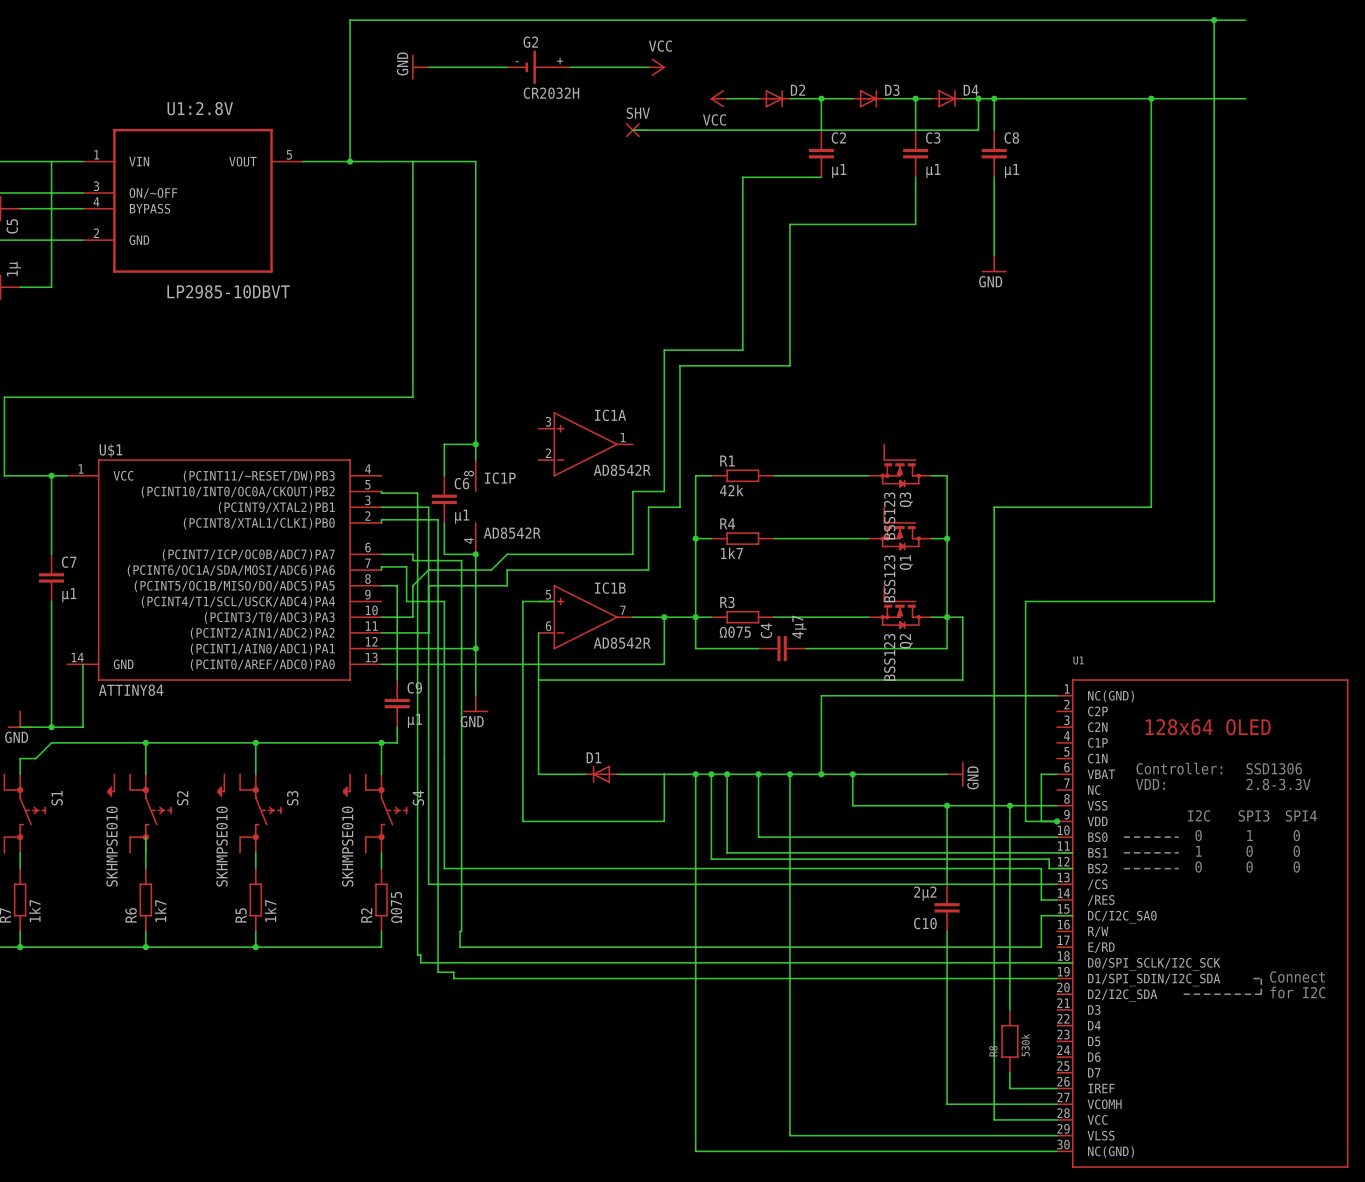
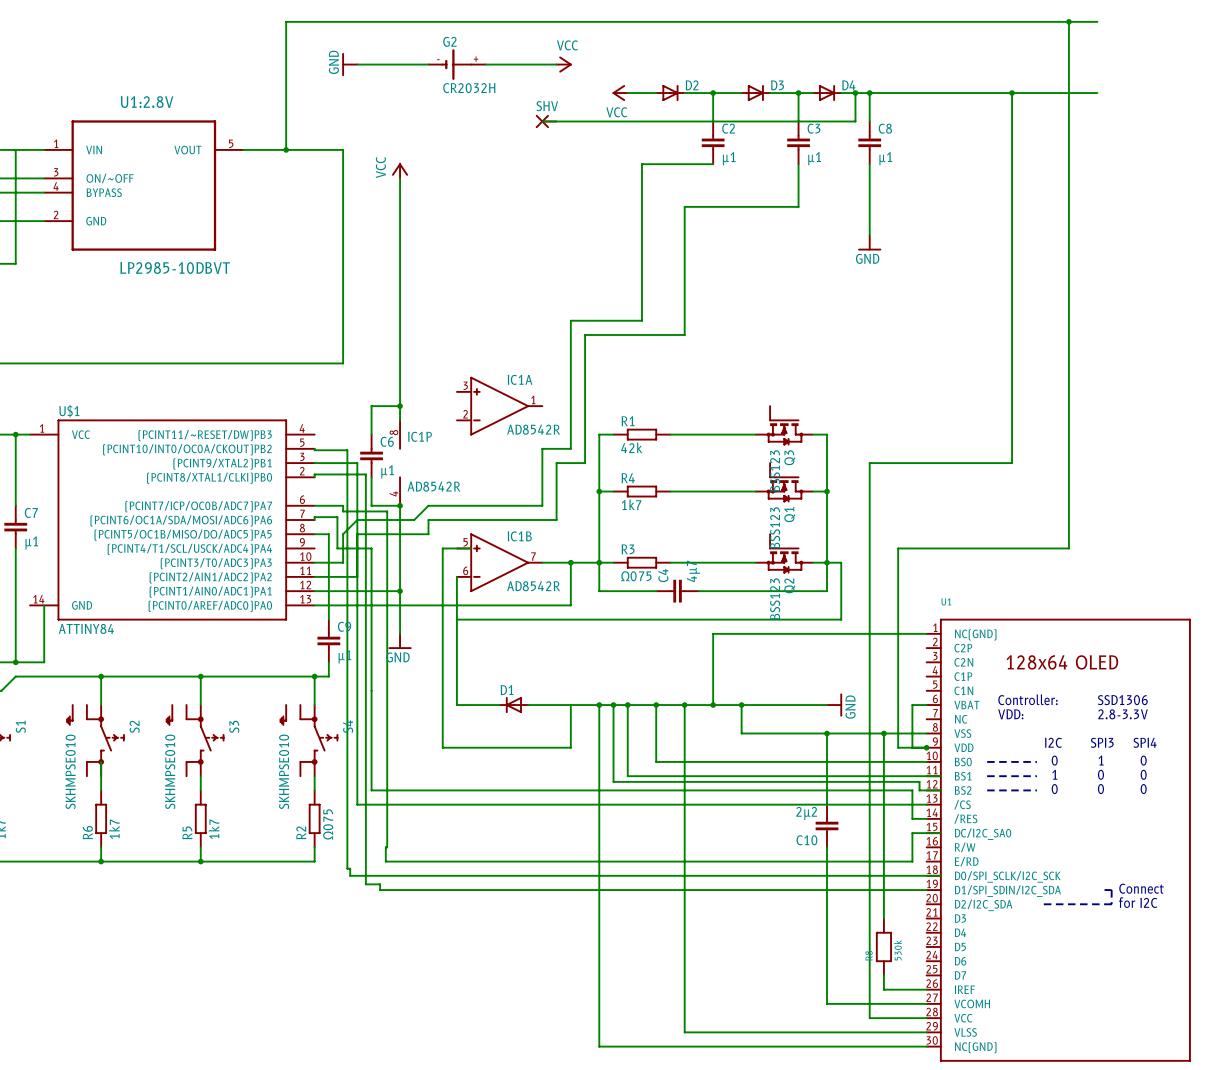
wire: (412, 161) (475, 161) (475, 193) -> none
power symbol: none -> VCC (400, 170)

